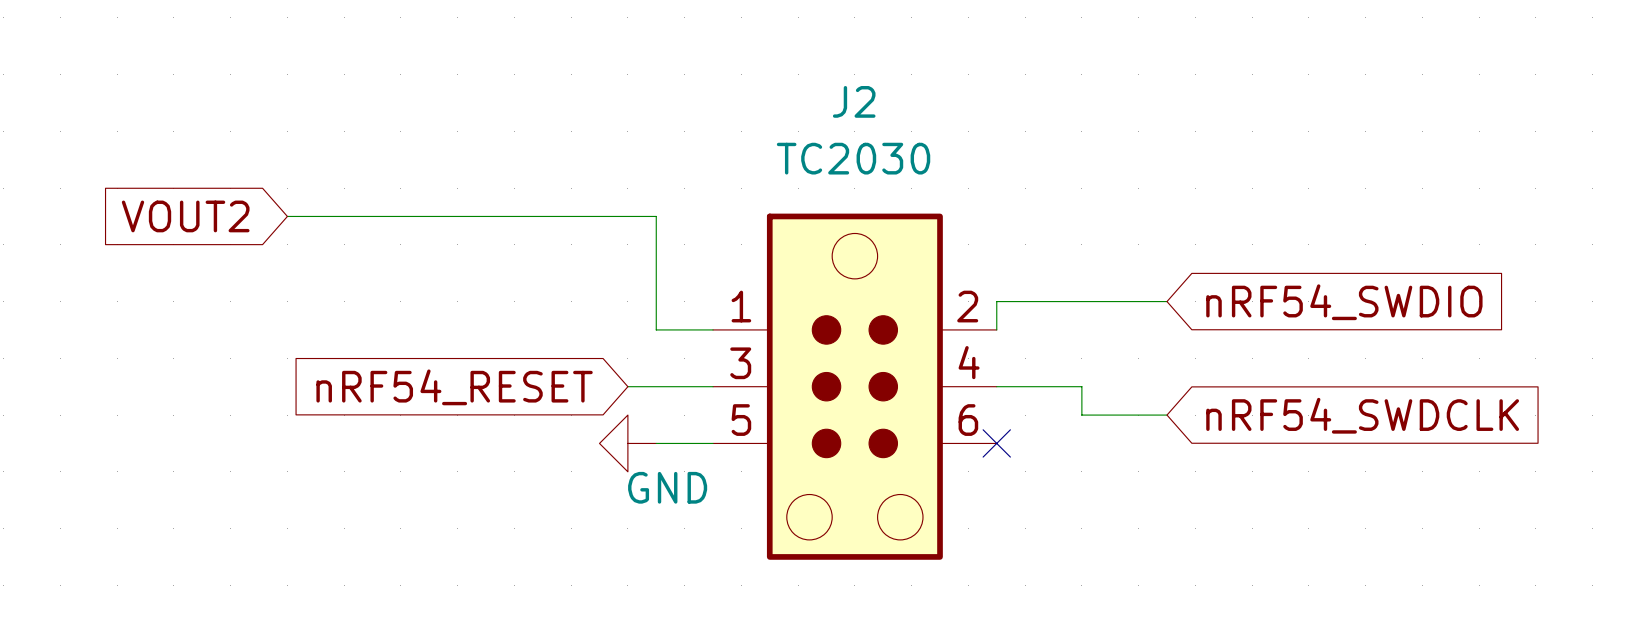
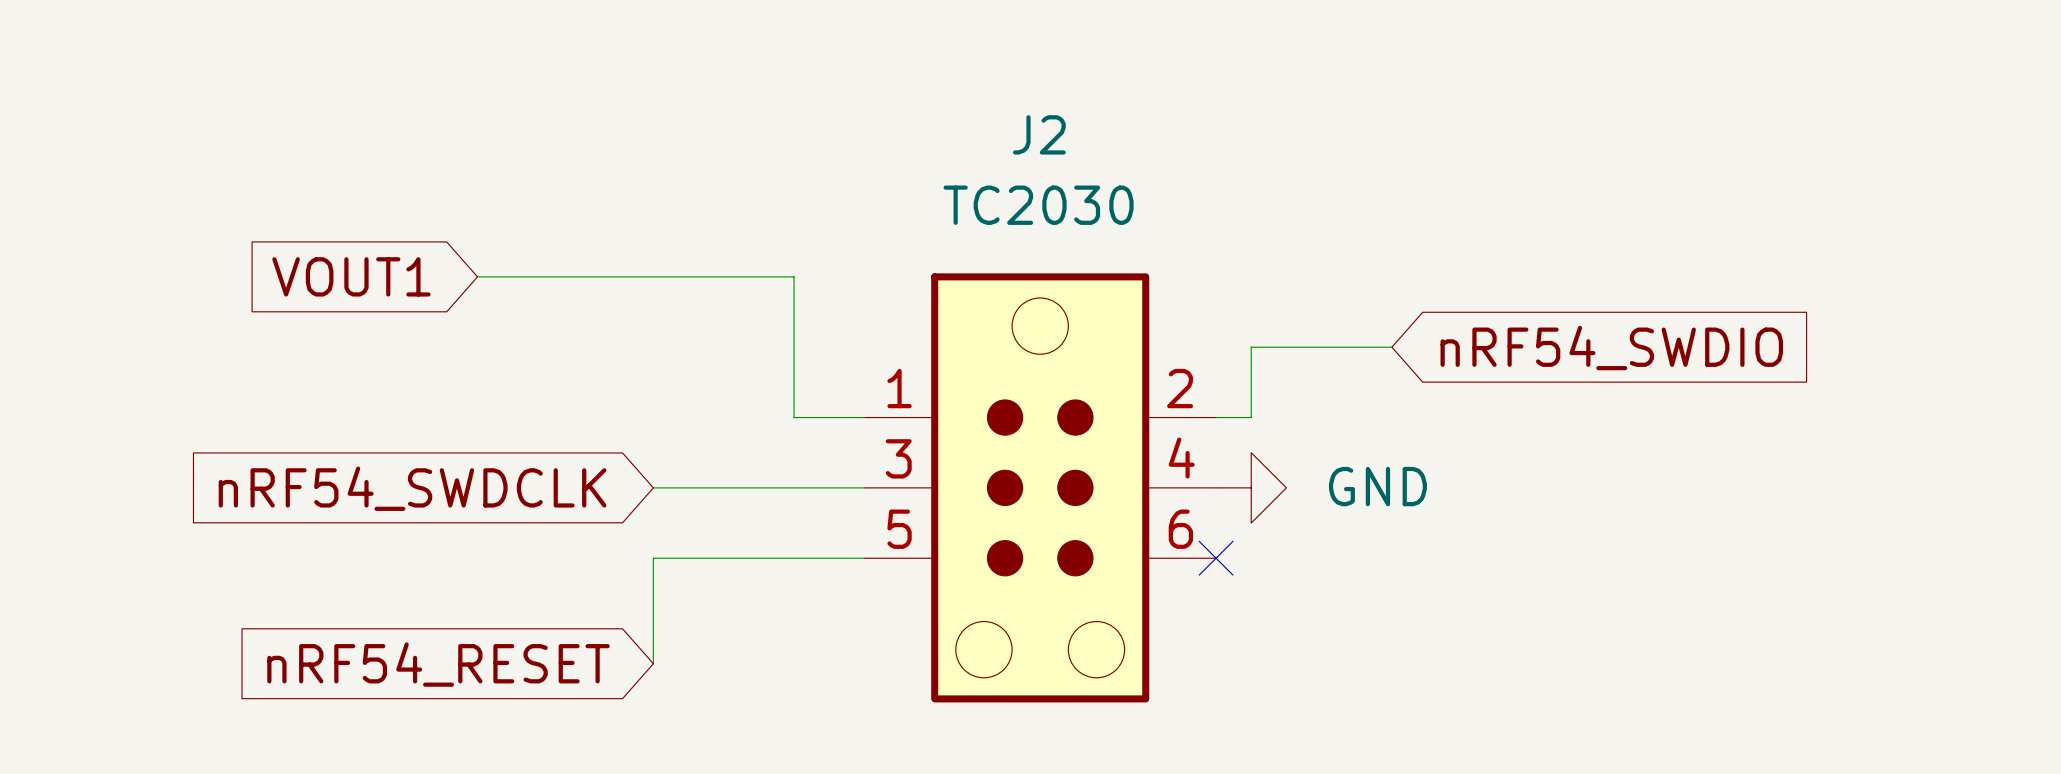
global label: VOUT2 (185, 216) -> VOUT1 (351, 276)
wire: (287, 216) (400, 216) -> none
wire: (1167, 301) (996, 301) (996, 329) -> (1391, 347) (1251, 347) (1251, 417) (1216, 417)
global label position: nRF54_SWDIO (1344, 302) -> nRF54_SWDIO (1611, 348)
wire: none -> (653, 487) (758, 487)
wire: (996, 386) (1081, 386) (1081, 415) (1167, 415) -> none
global label: none -> nRF54_SWDCLK (412, 488)
global label position: nRF54_RESET (454, 387) -> nRF54_RESET (438, 664)
global label: nRF54_SWDCLK (1362, 415) -> none
power symbol rotation: 0° (627, 443) -> 180° (1251, 487)
power symbol position: GND (627, 443) -> GND (1251, 487)
wire: none -> (794, 558) (653, 558) (653, 663)
power symbol text position: GND (667, 487) -> GND (1377, 486)

